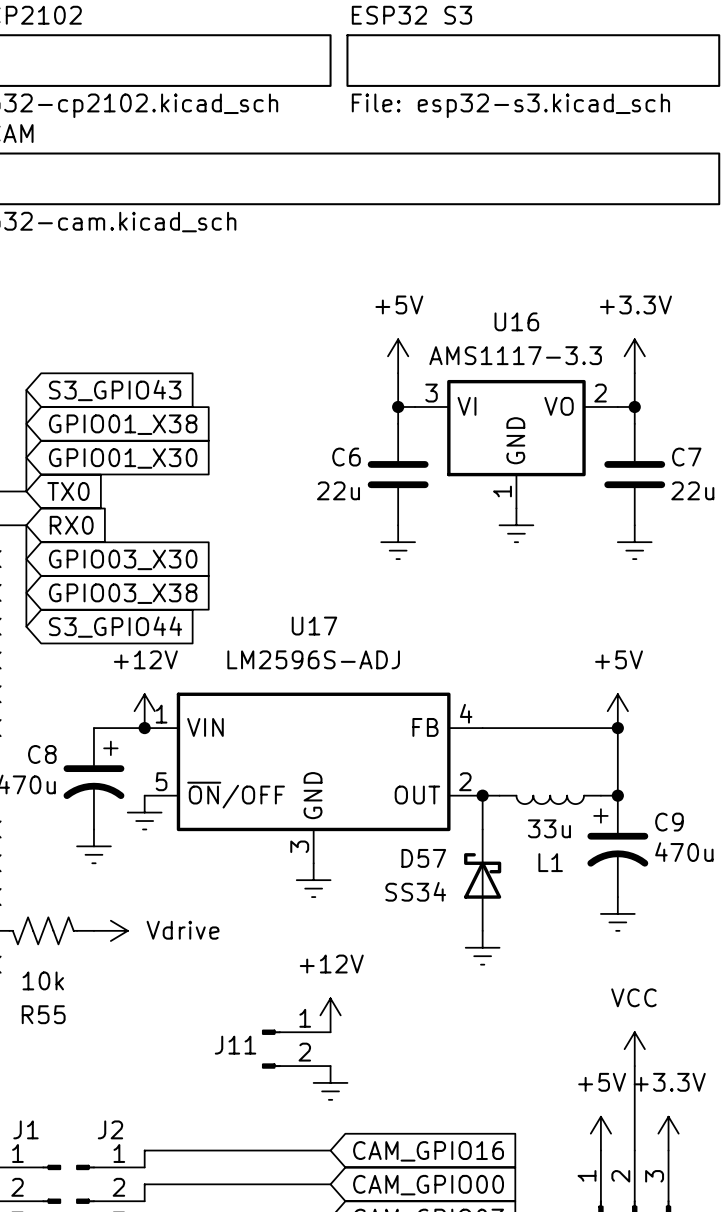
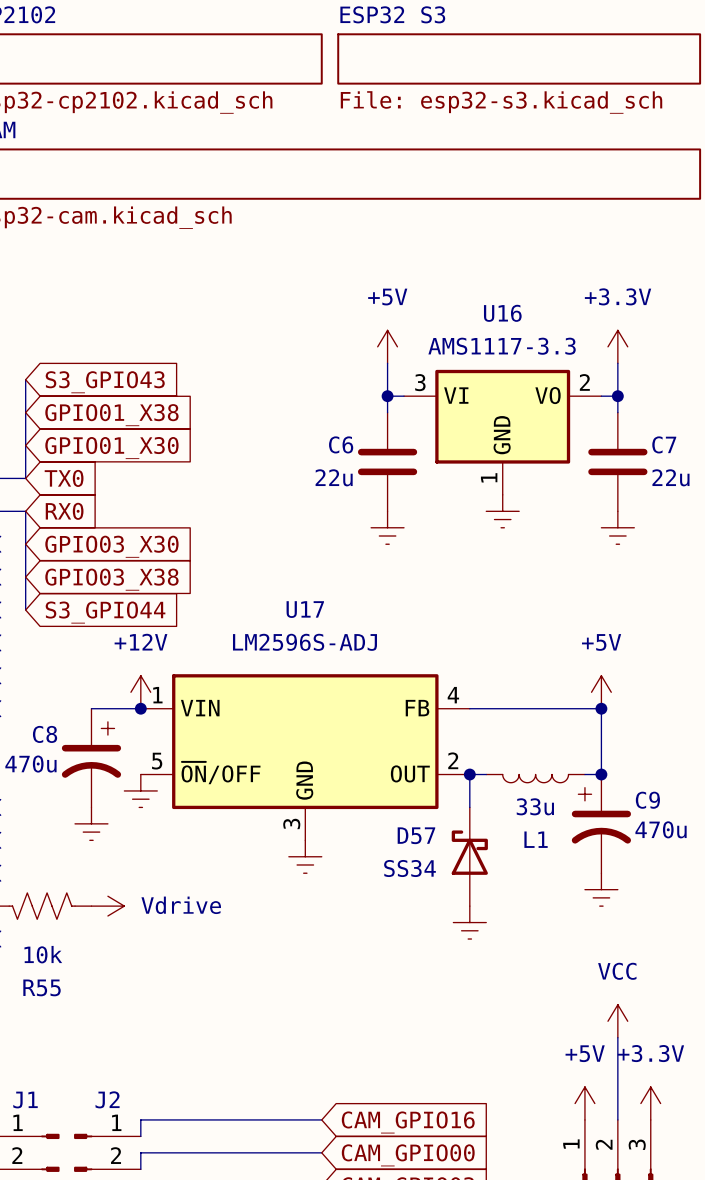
power symbol: +12V (330, 1015) -> none
J11: (296, 1049) -> none
power symbol: (330, 1082) -> none

